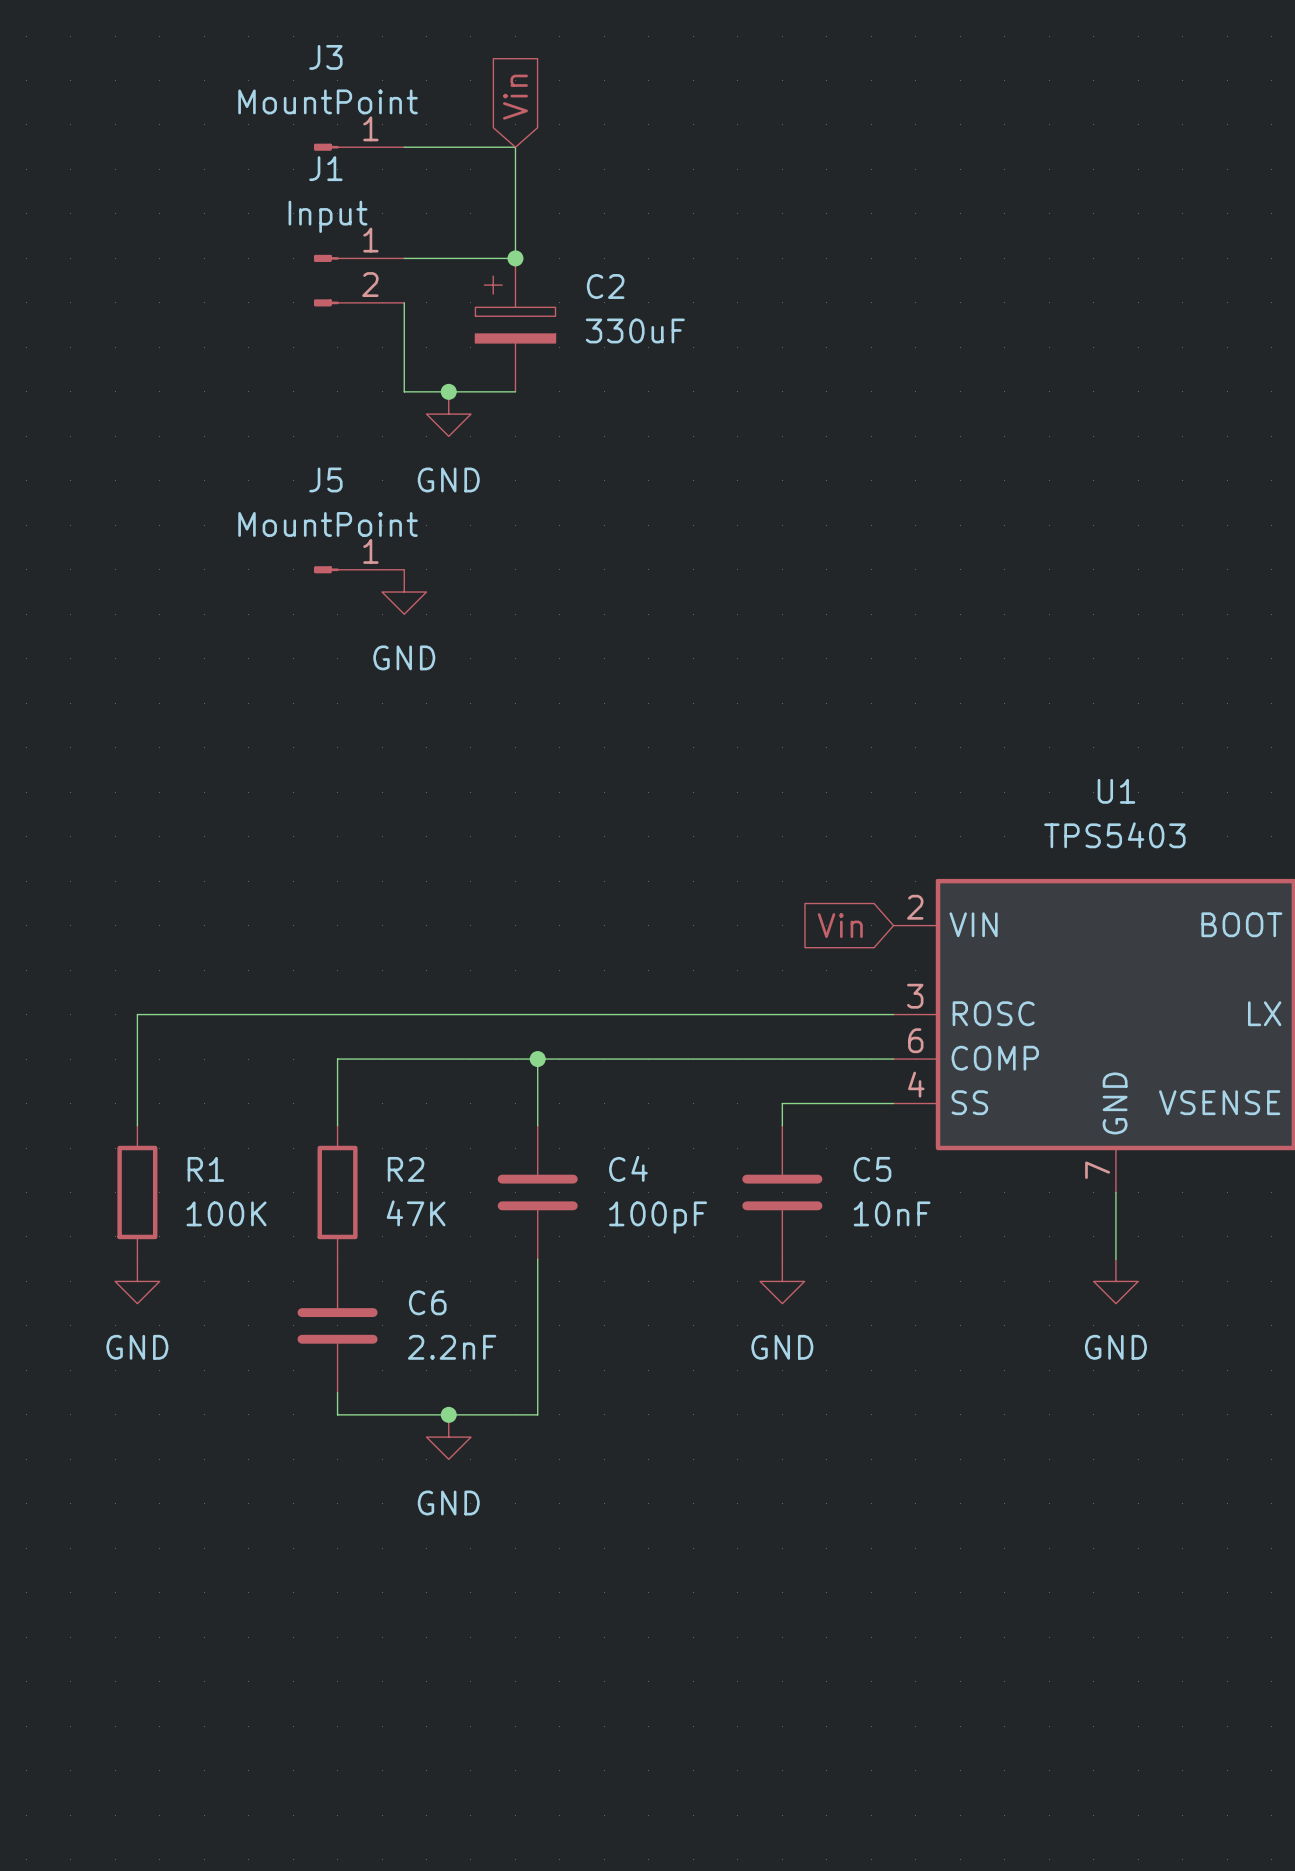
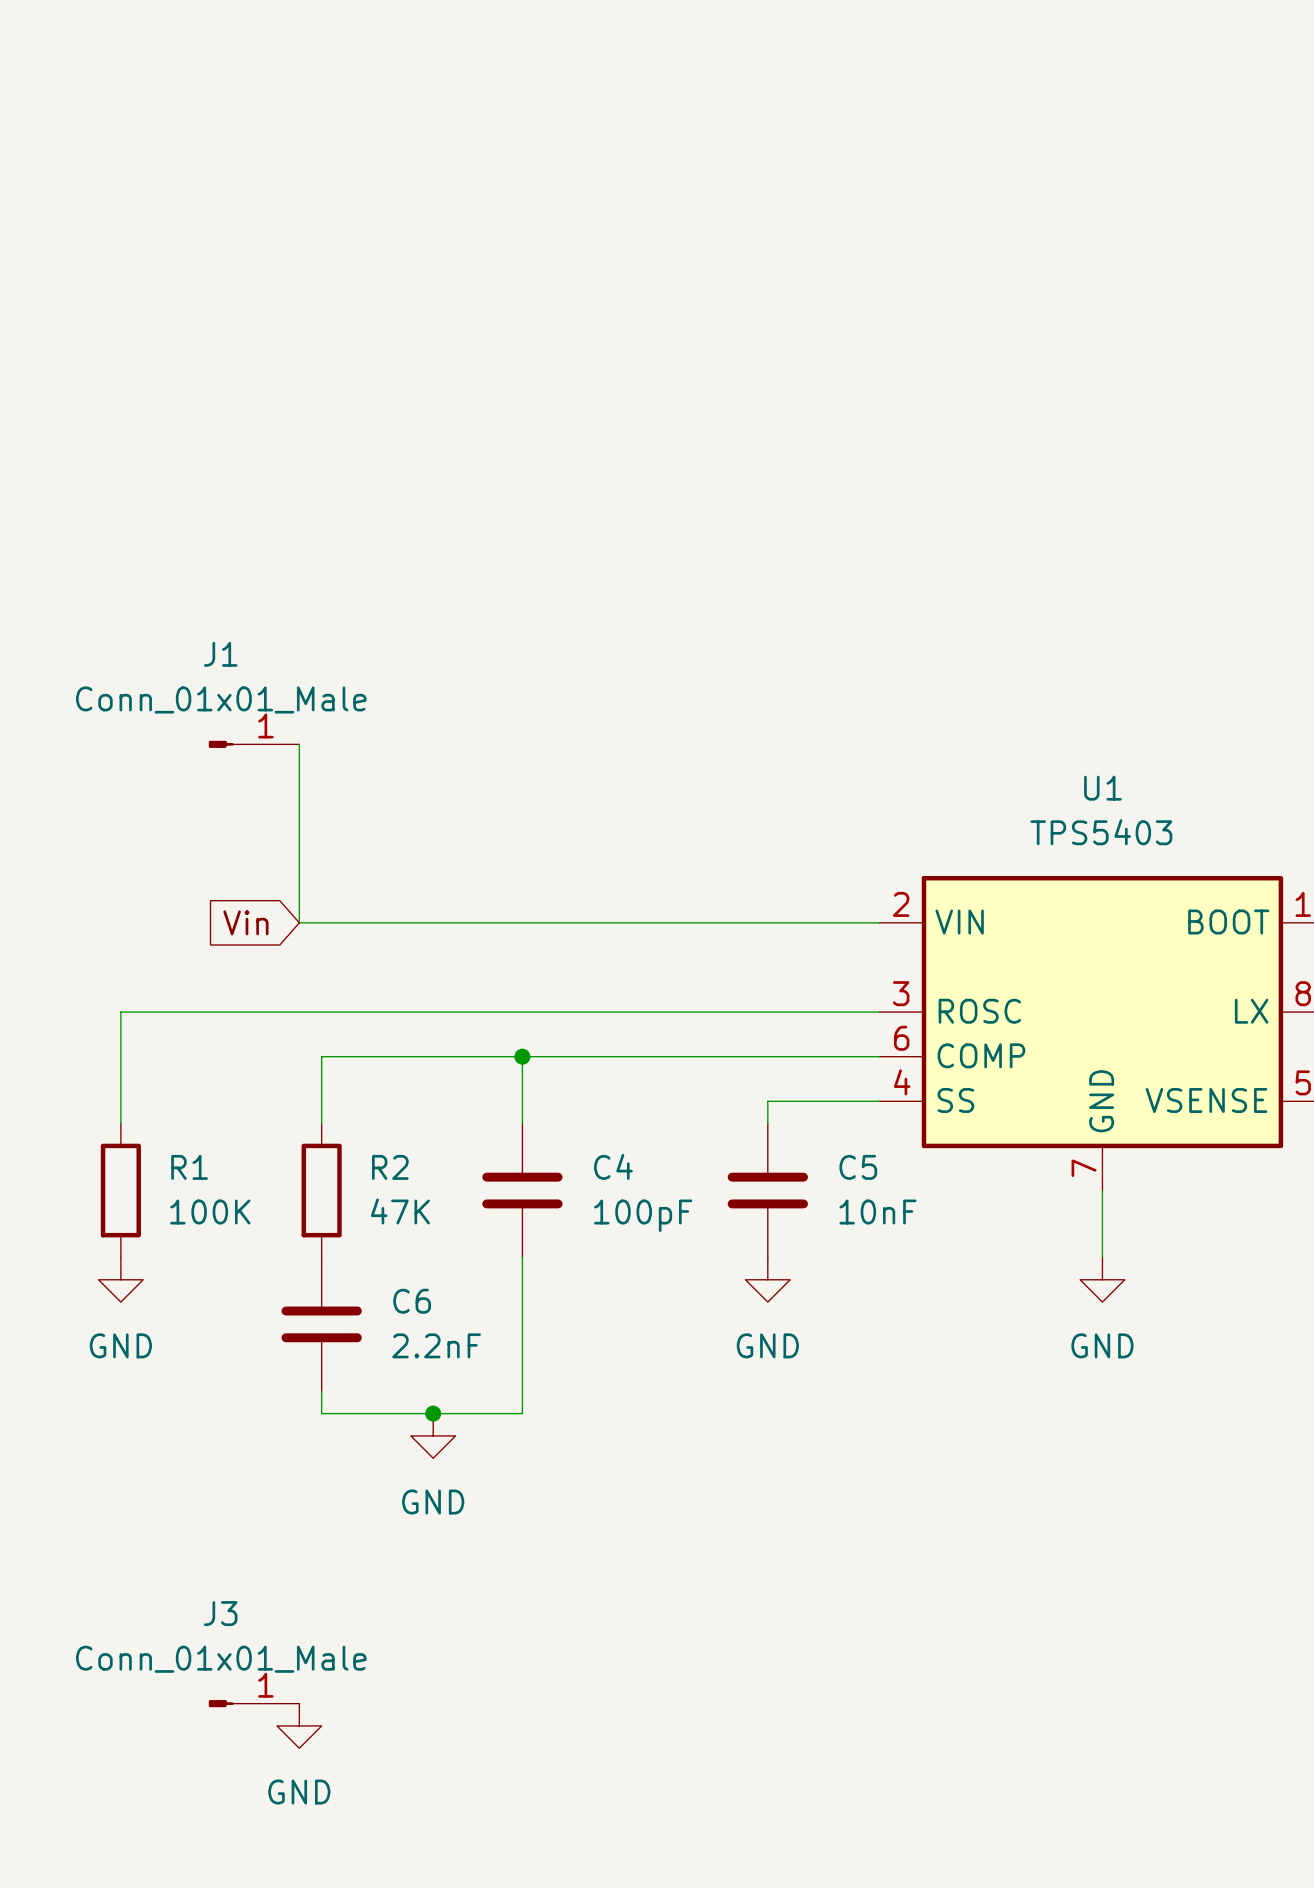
global label: Vin (515, 97) -> none
J3 value: MountPoint (328, 101) -> Conn_01x01_Male (221, 1659)
J3 position: (359, 147) -> (254, 1703)
wire: (404, 147) (515, 147) (515, 258) (404, 258) -> none
J1 value: Input (328, 216) -> Conn_01x01_Male (221, 699)
J1 symbol: [313, 254, 405, 307] -> [208, 740, 300, 748]
junction: (515, 258) -> none
wire: (404, 302) (404, 391) (515, 391) -> none
C2: 330uF (515, 325) -> none
junction: (448, 391) -> none
power symbol: GND (448, 414) -> none
J5: MountPoint (359, 569) -> none
power symbol: GND (404, 592) -> none
wire: none -> (299, 744) (299, 922) (879, 922)
global label: none -> Vin (245, 922)
global label: Vin (840, 925) -> none
power symbol: none -> GND (299, 1725)

